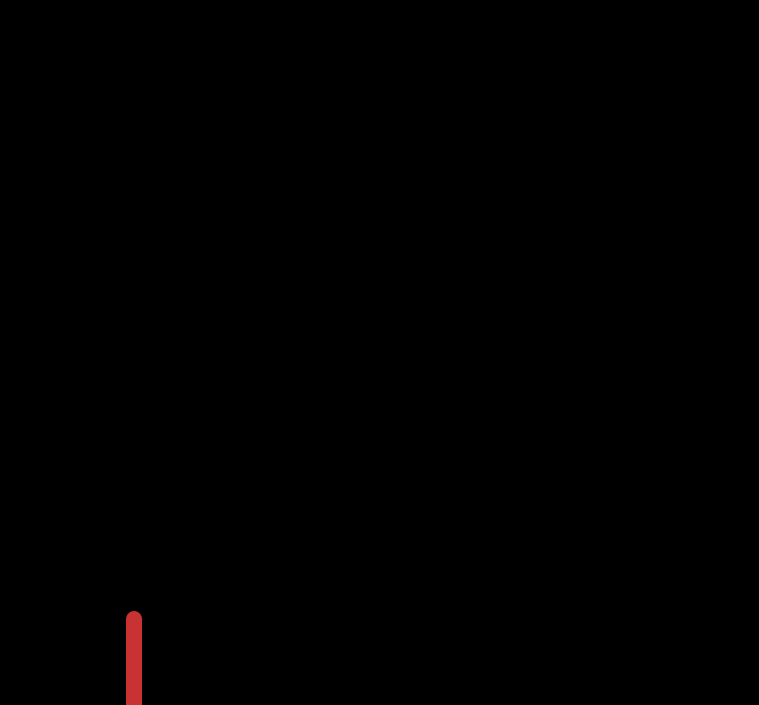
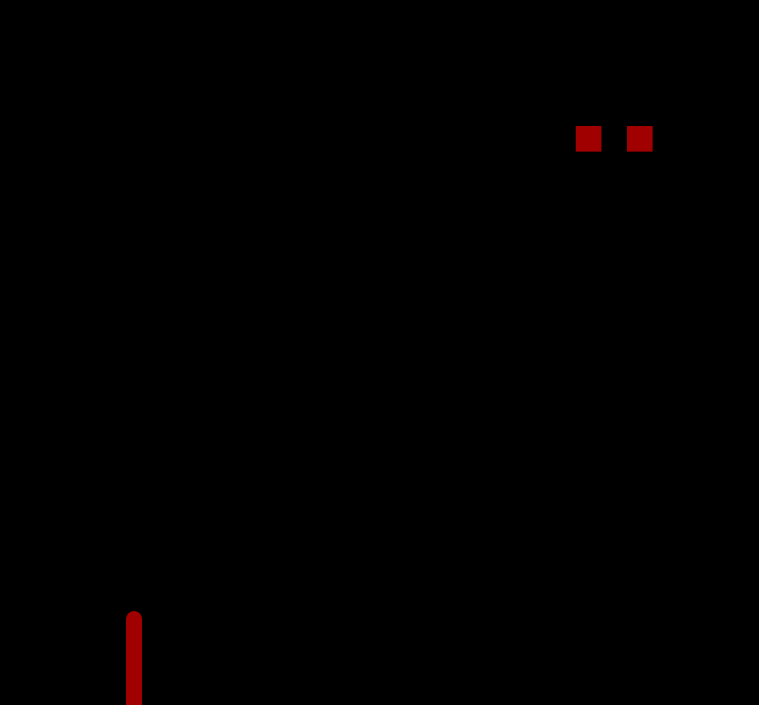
part: none -> (614, 138)

